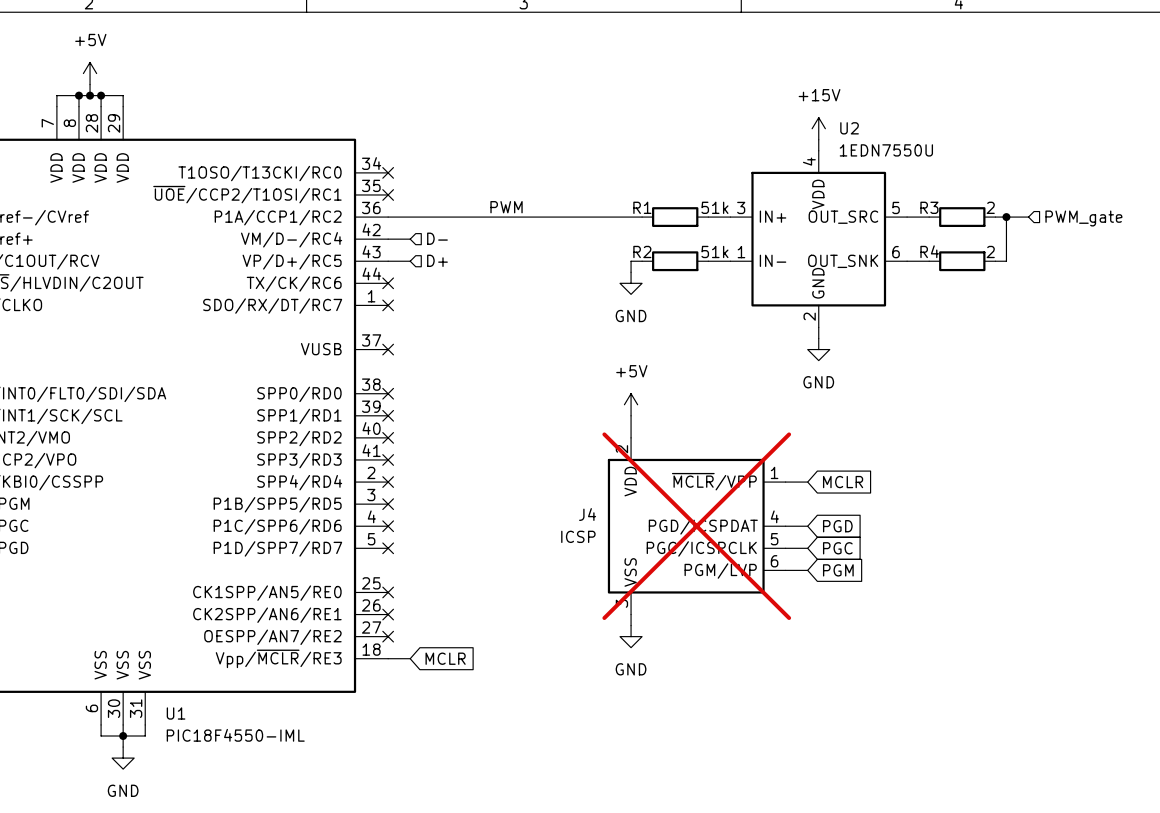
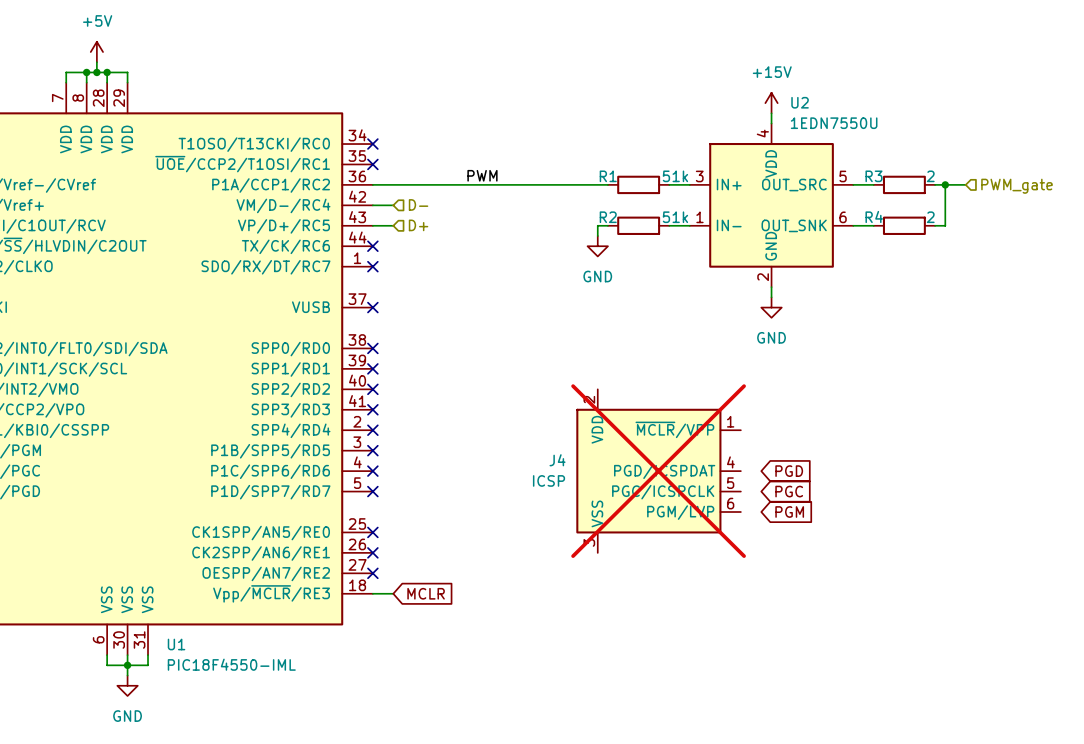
power symbol: +5V (631, 404) -> none
wire: (631, 415) (631, 437) -> none
wire: (785, 482) (807, 482) -> none
global label: MCLR (843, 482) -> none
wire: (785, 526) (807, 526) -> none
wire: (785, 548) (807, 548) -> none
wire: (785, 570) (807, 570) -> none
wire: (631, 614) (631, 625) -> none
power symbol: GND (631, 636) -> none

